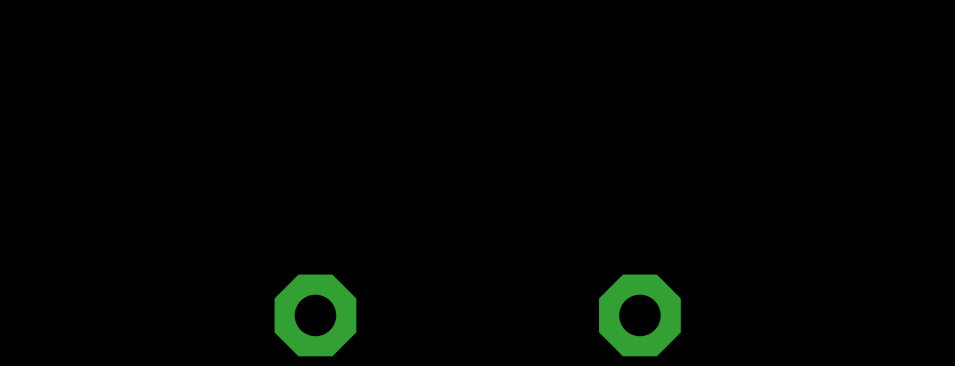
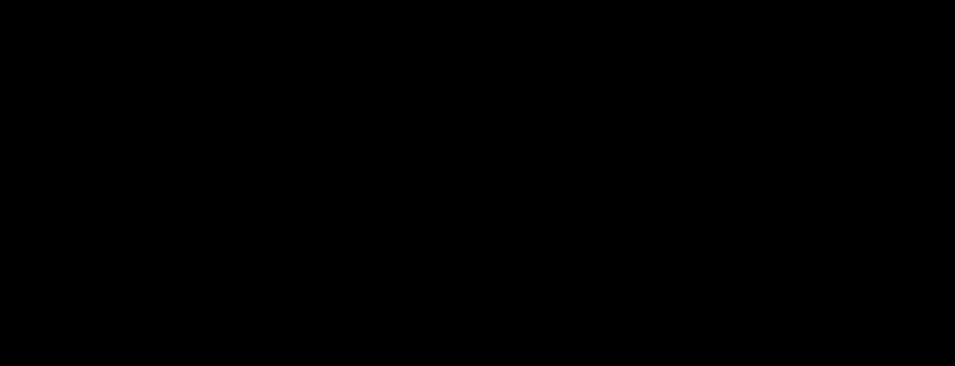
part: (315, 315) -> none
part: (639, 315) -> none

